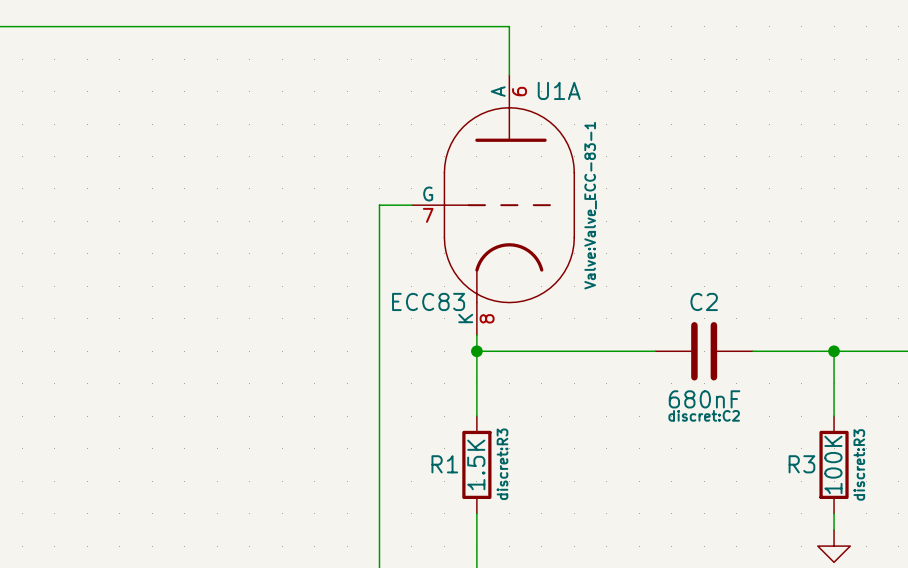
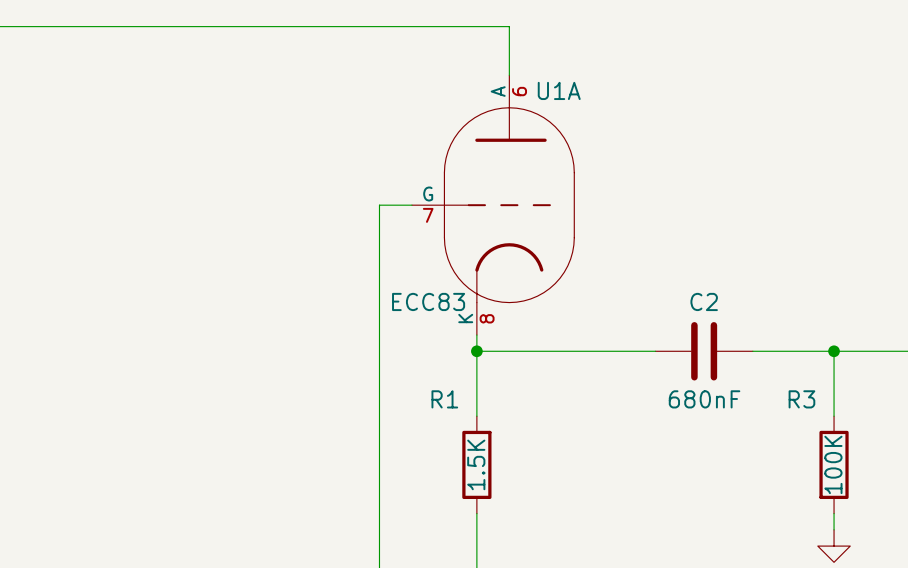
U1A text: Valve:Valve_ECC-83-1 (590, 205) -> none
C2 text: discret:C2 (704, 415) -> none
R1 name position: R1 (444, 464) -> R1 (444, 399)
R1 text: discret:R3 (502, 464) -> none
R3 name position: R3 (801, 464) -> R3 (801, 399)
R3 text: discret:R3 (859, 464) -> none

